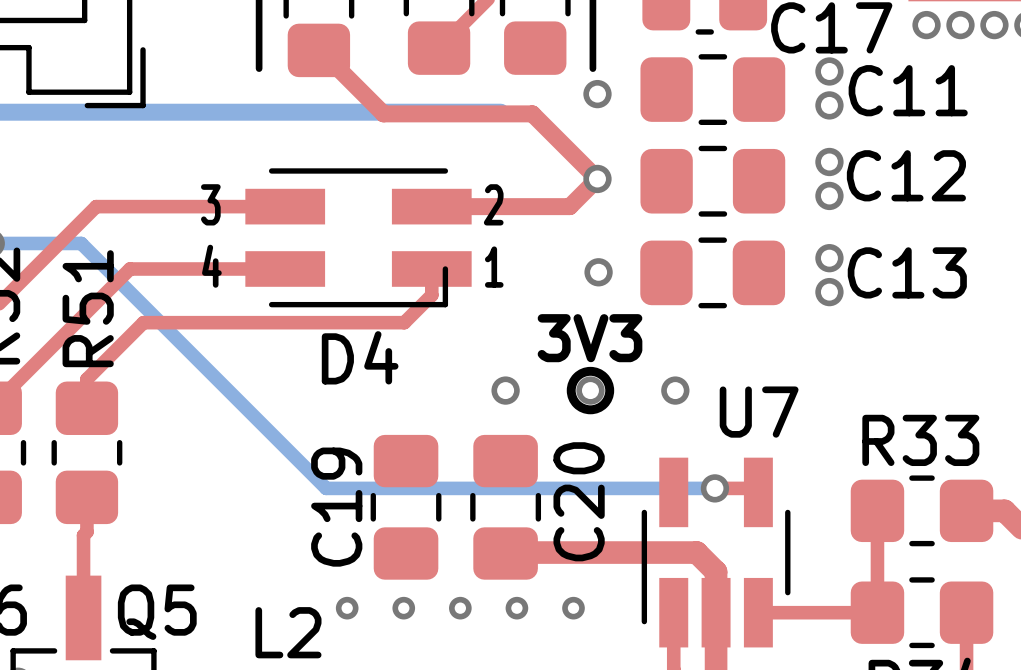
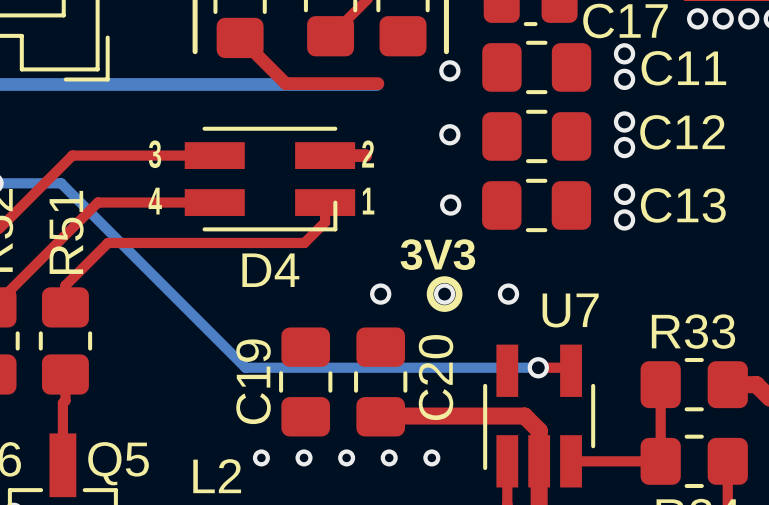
top track: (318, 50) (383, 113) (532, 113) (597, 178) (569, 206) (485, 206) -> (240, 37) (285, 83) (377, 83)

